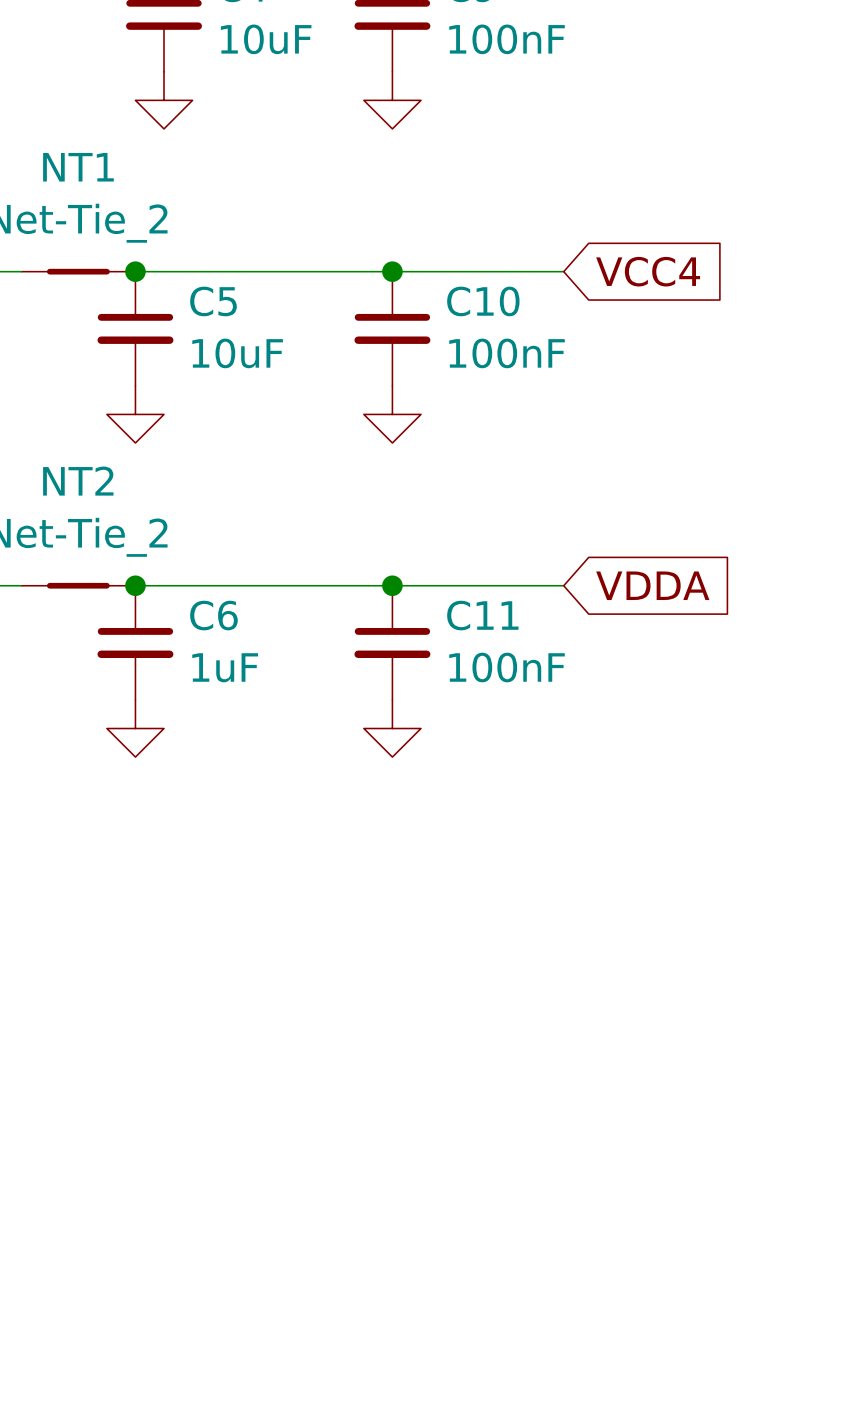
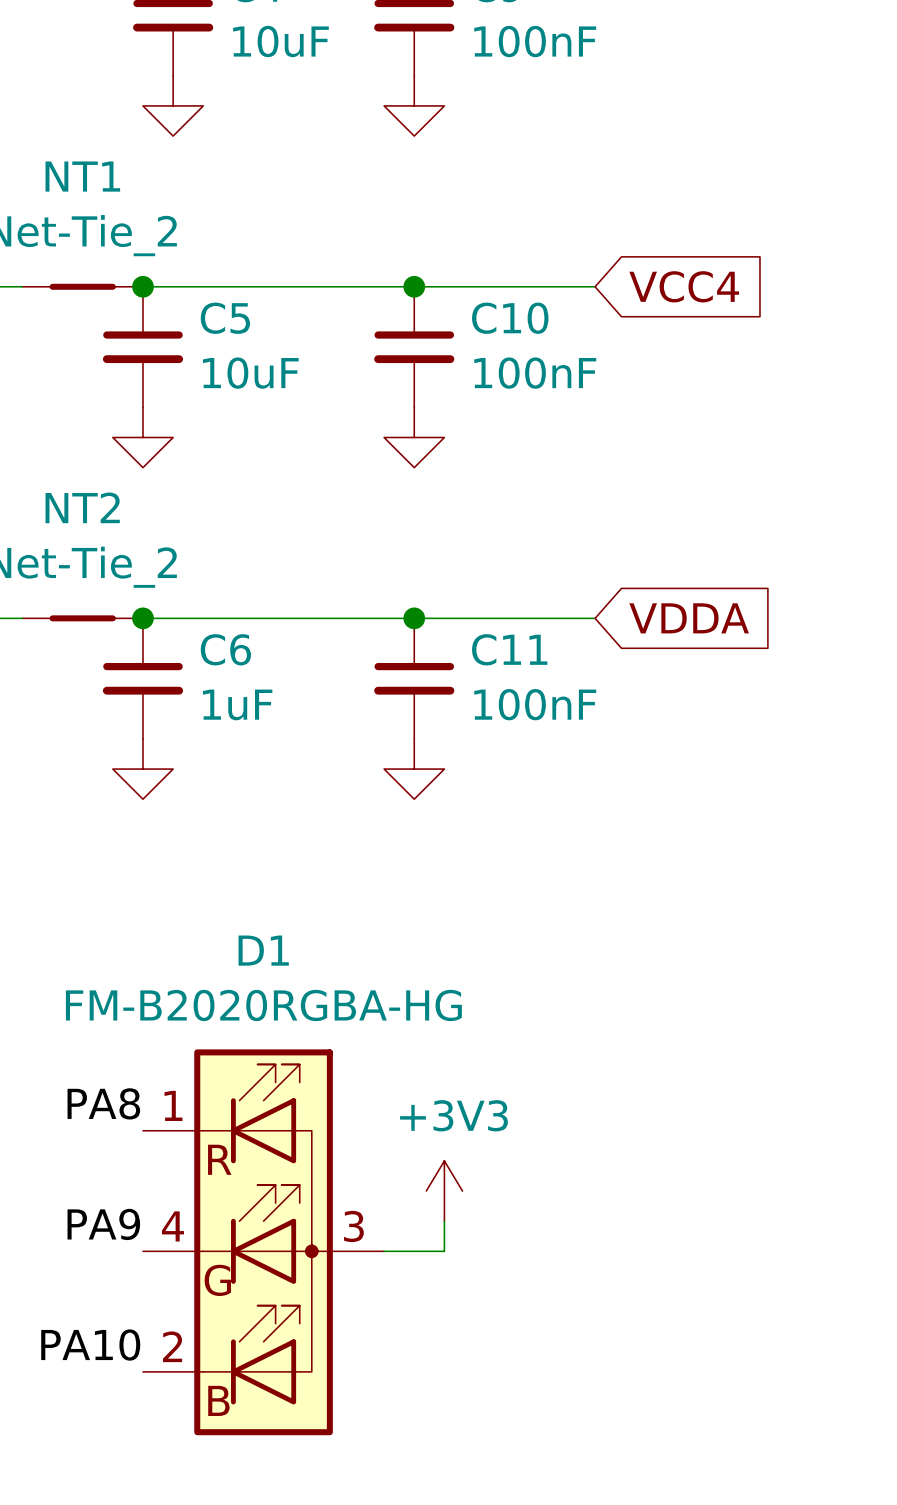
label: none -> PA8 (103, 1103)
power symbol: none -> +3V3 (444, 1191)
wire: none -> (444, 1221) (444, 1251) (384, 1251)
label: none -> PA9 (103, 1224)
D1: none -> FM-B2020RGBA-HG (263, 1242)
label: none -> PA10 (90, 1345)

